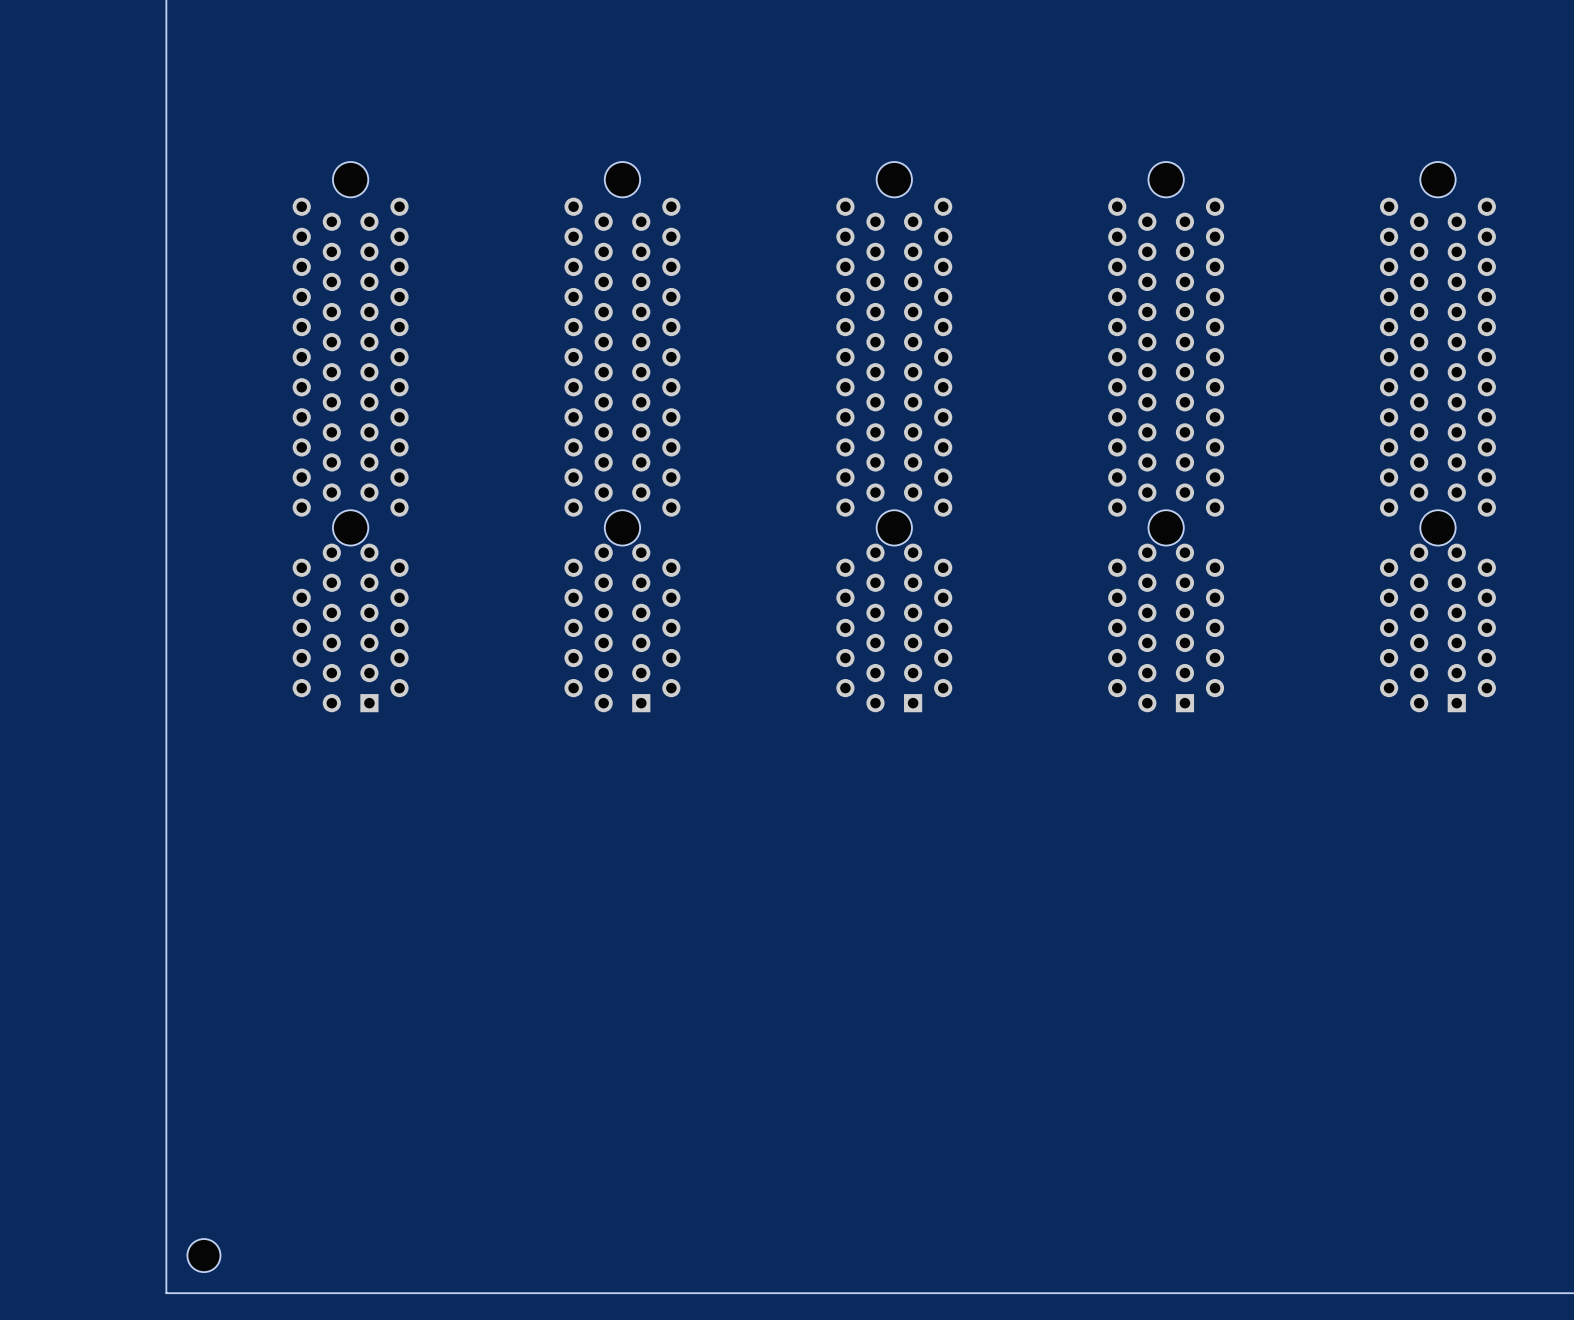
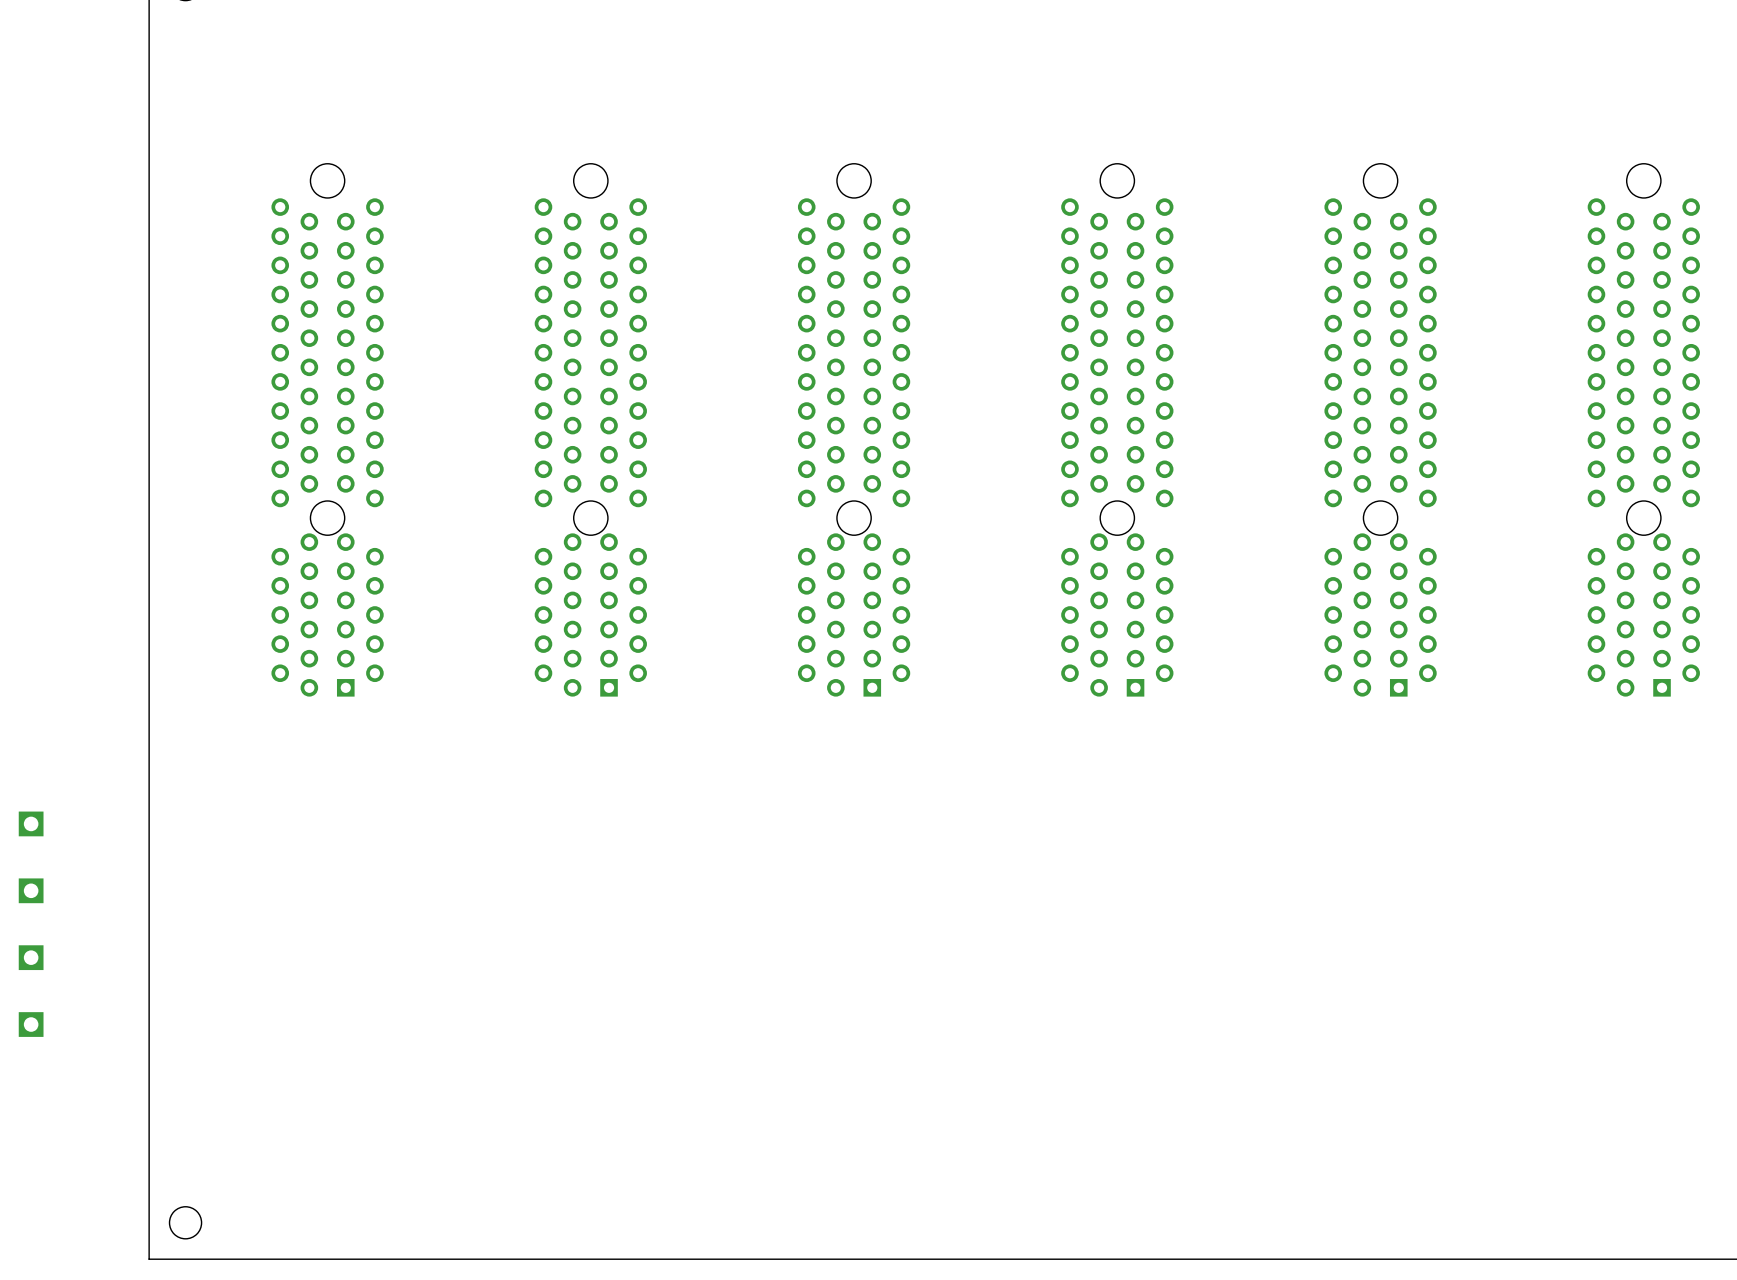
part: none -> (31, 823)
part: none -> (31, 890)
part: none -> (31, 957)
part: none -> (31, 1024)

